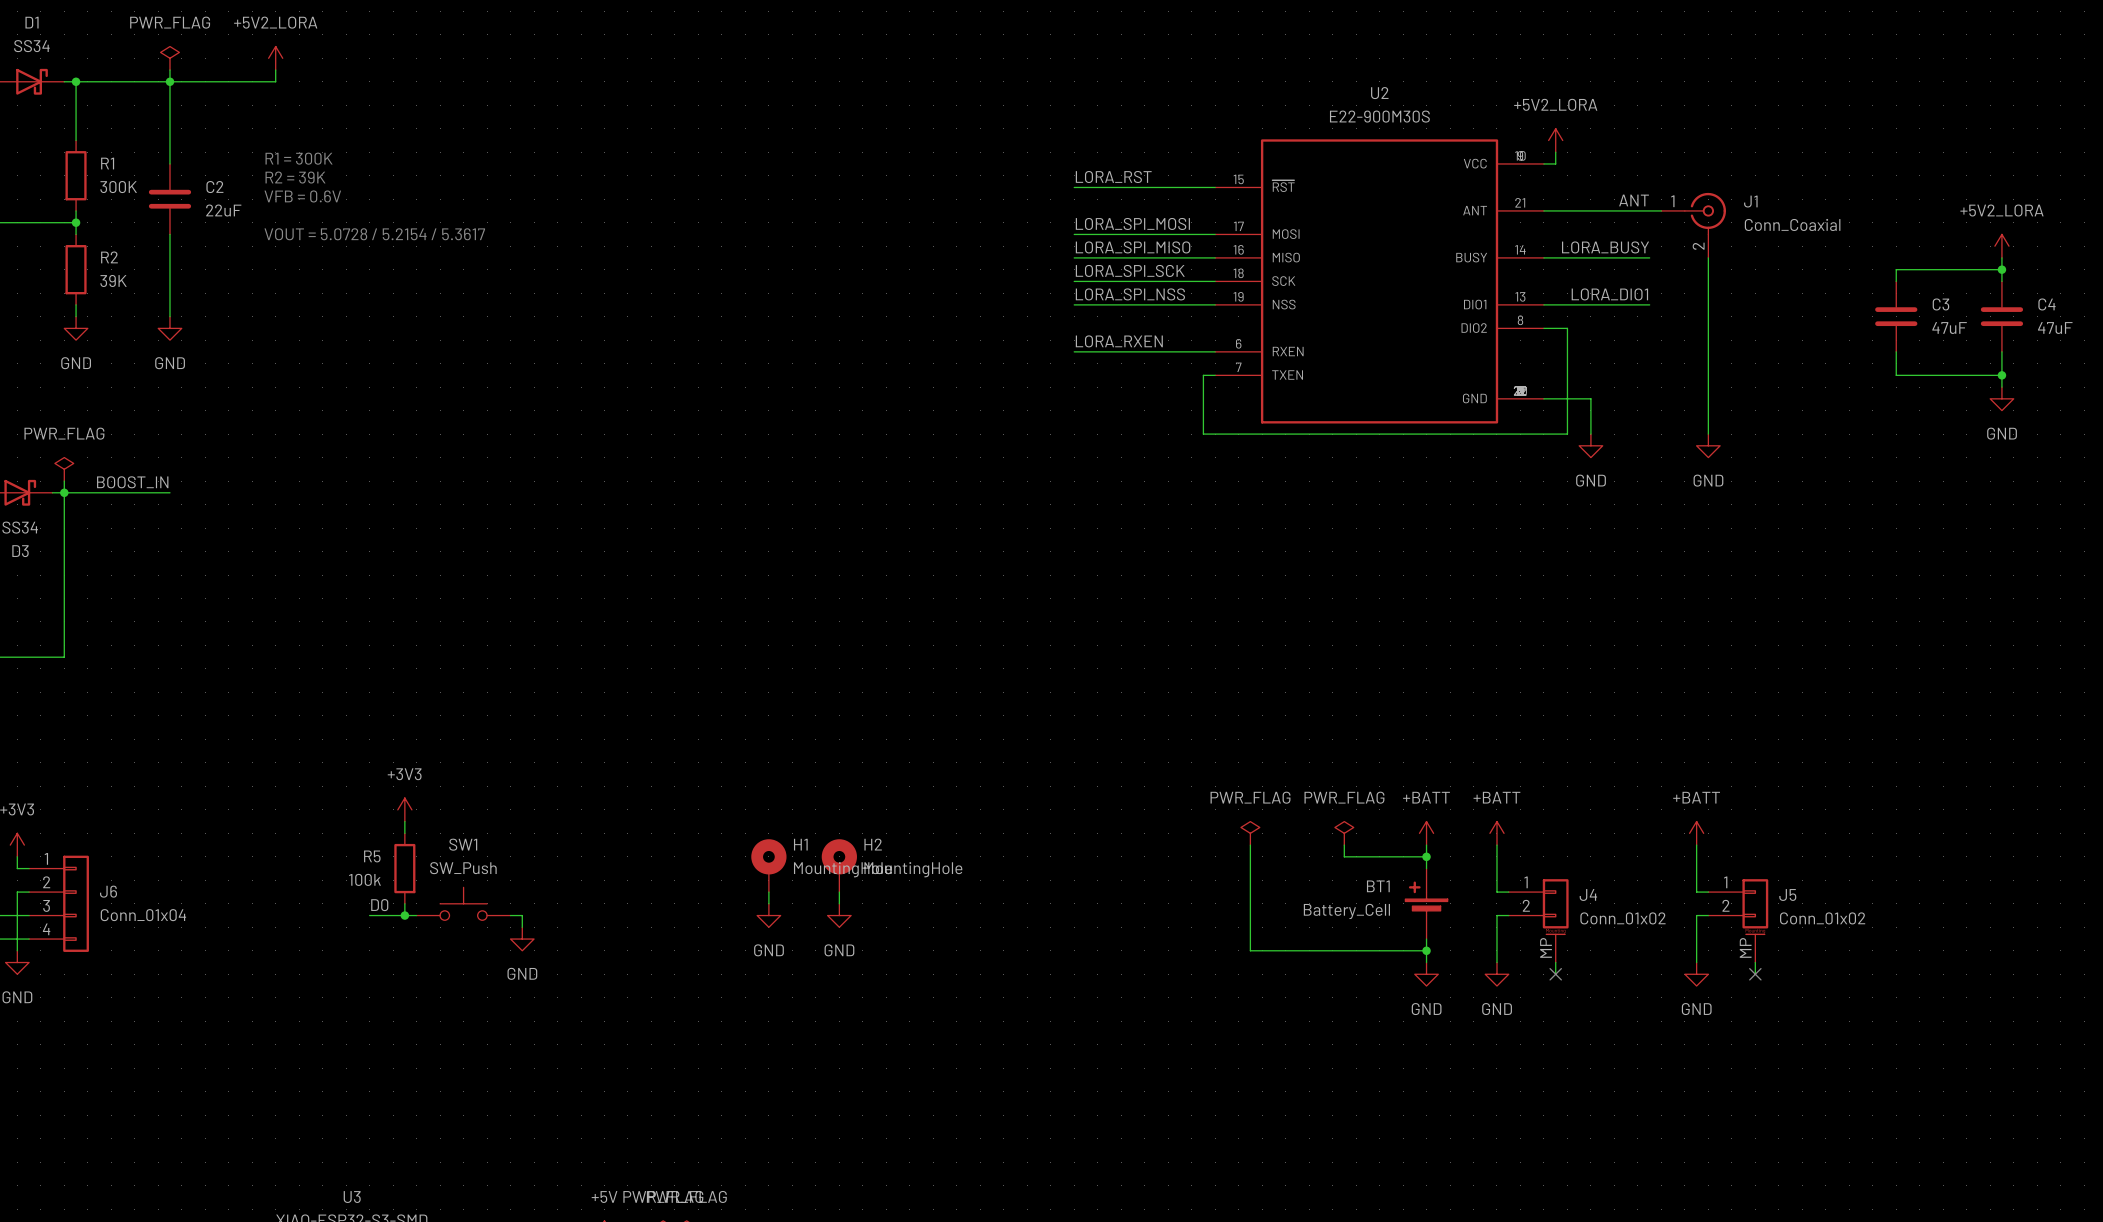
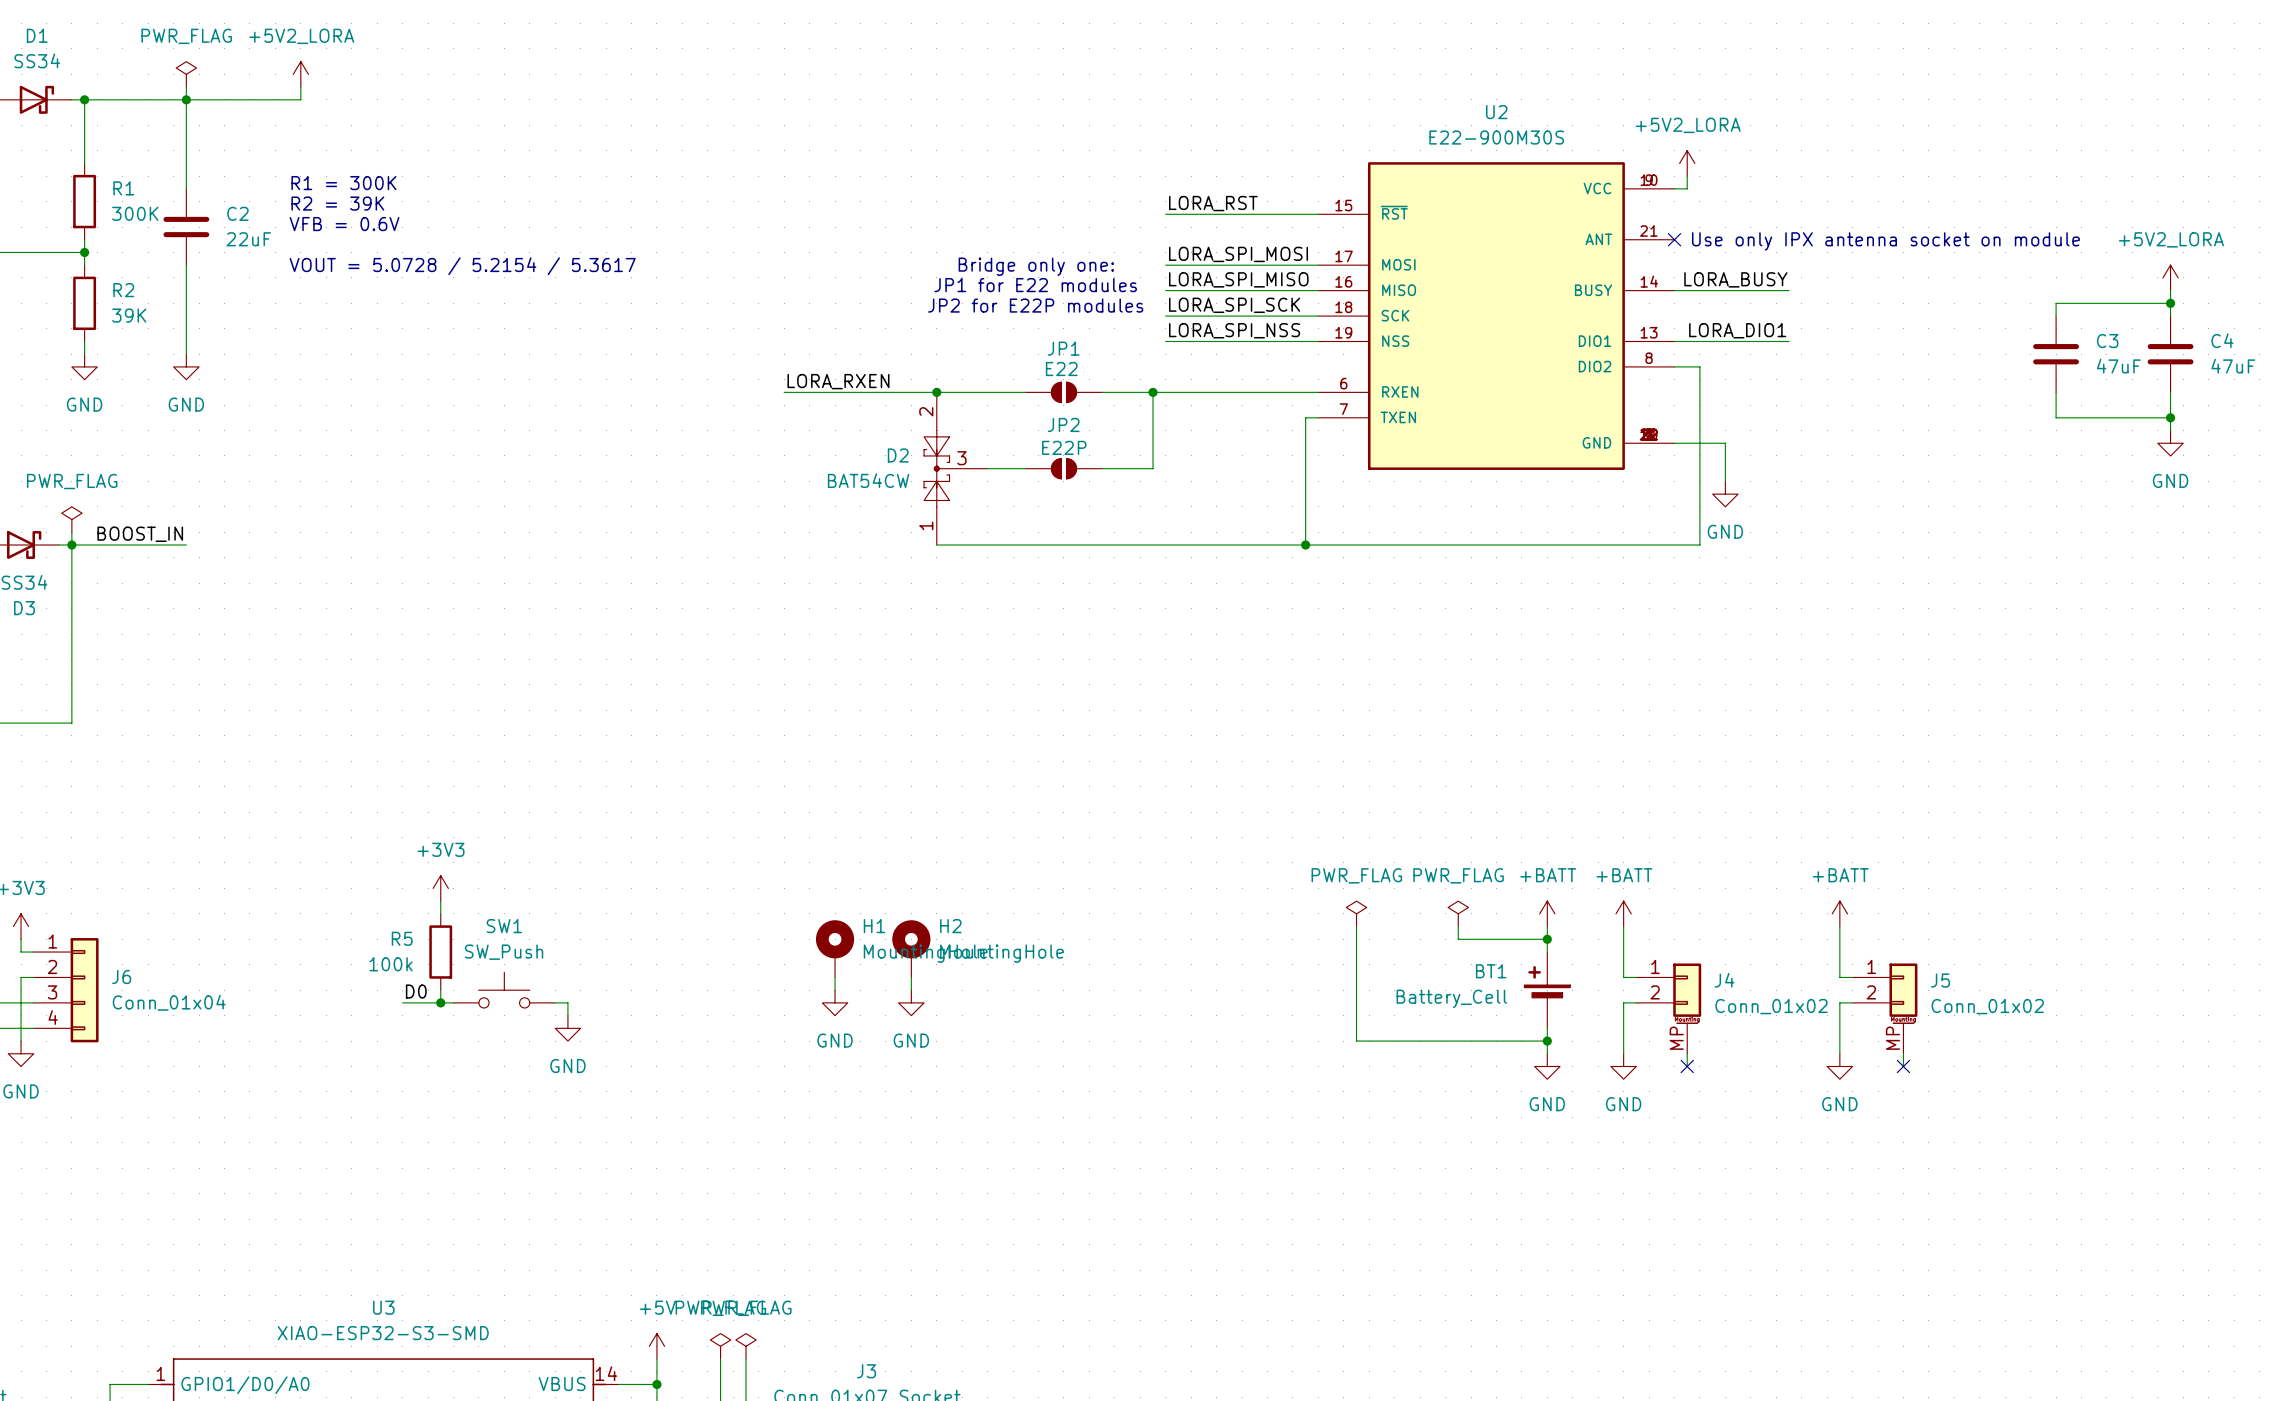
label: ANT (1634, 200) -> none
wire: (1543, 210) (1661, 210) -> none
no-connect mark: none -> (1674, 239)
text: none -> Use only IPX antenna socket on module (1885, 241)
J1: Conn_Coaxial (1693, 225) -> none
text: none -> Bridge only one: (1036, 266)
text: none -> JP1 for E22 modules (1035, 285)
wire: (1708, 257) (1708, 434) -> none
text: none -> JP2 for E22P modules (1035, 305)
label: none -> LORA_RXEN (838, 381)
label: LORA_RXEN (1119, 341) -> none
wire: none -> (784, 392) (1025, 392)
junction: none -> (936, 392)
JP1: none -> E22 (1063, 392)
wire: none -> (1102, 392) (1165, 392)
wire: none -> (1153, 392) (1153, 468) (1102, 468)
junction: none -> (1153, 392)
D2: none -> BAT54CW (955, 468)
wire: none -> (987, 468) (1025, 468)
JP2: none -> E22P (1063, 468)
wire: (1203, 434) (1567, 434) -> (936, 545) (1699, 545) (1699, 481)
wire: none -> (1305, 481) (1305, 545)
power symbol: GND (1708, 445) -> none
junction: none -> (1305, 545)

